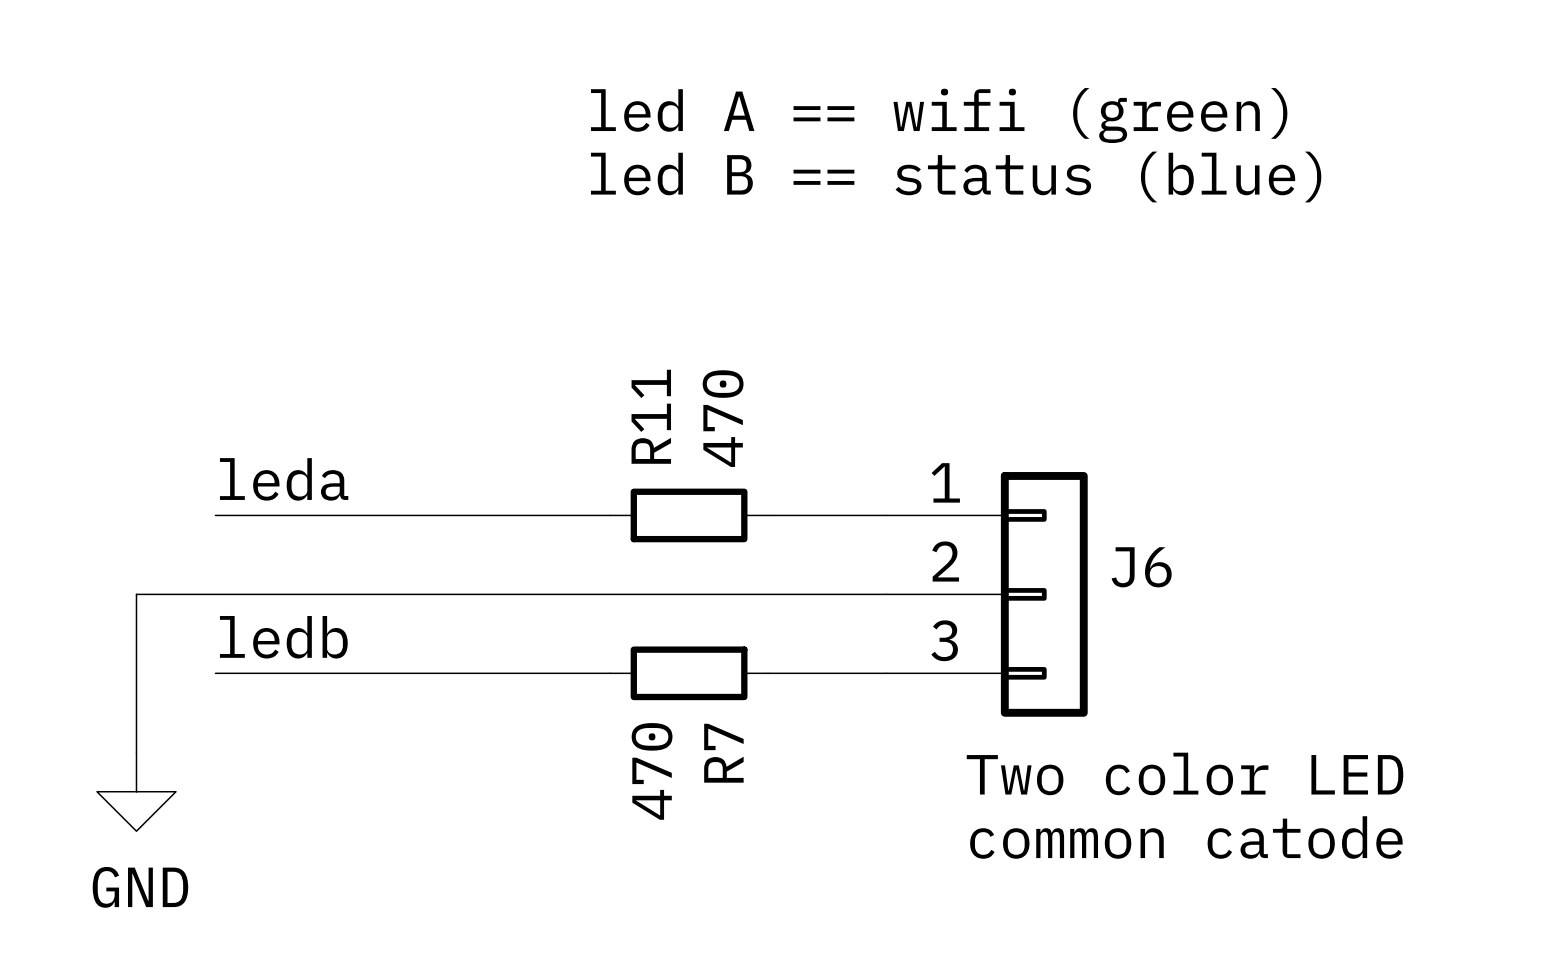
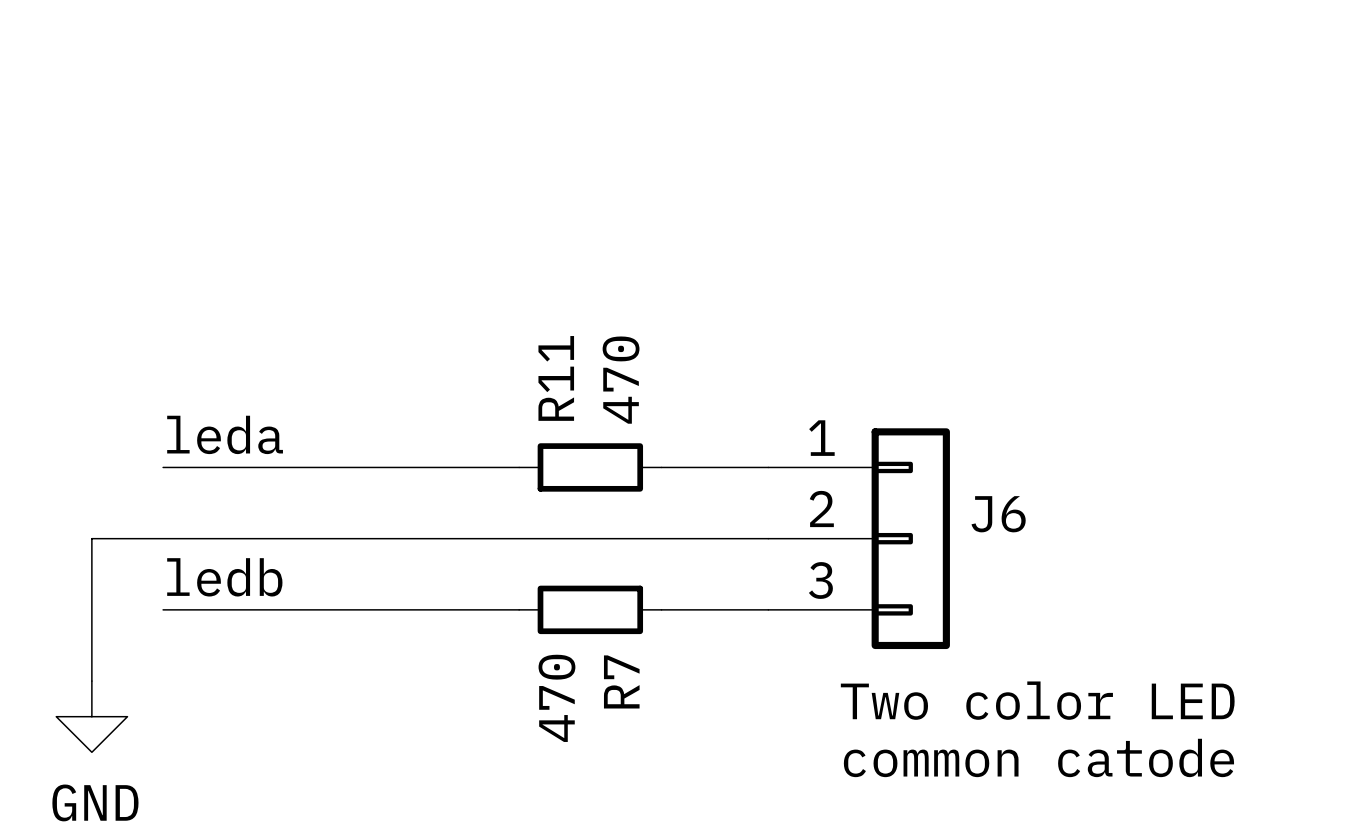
text: led A == wifi (green) (939, 115) -> none
text: led B == status (blue) (956, 176) -> none

